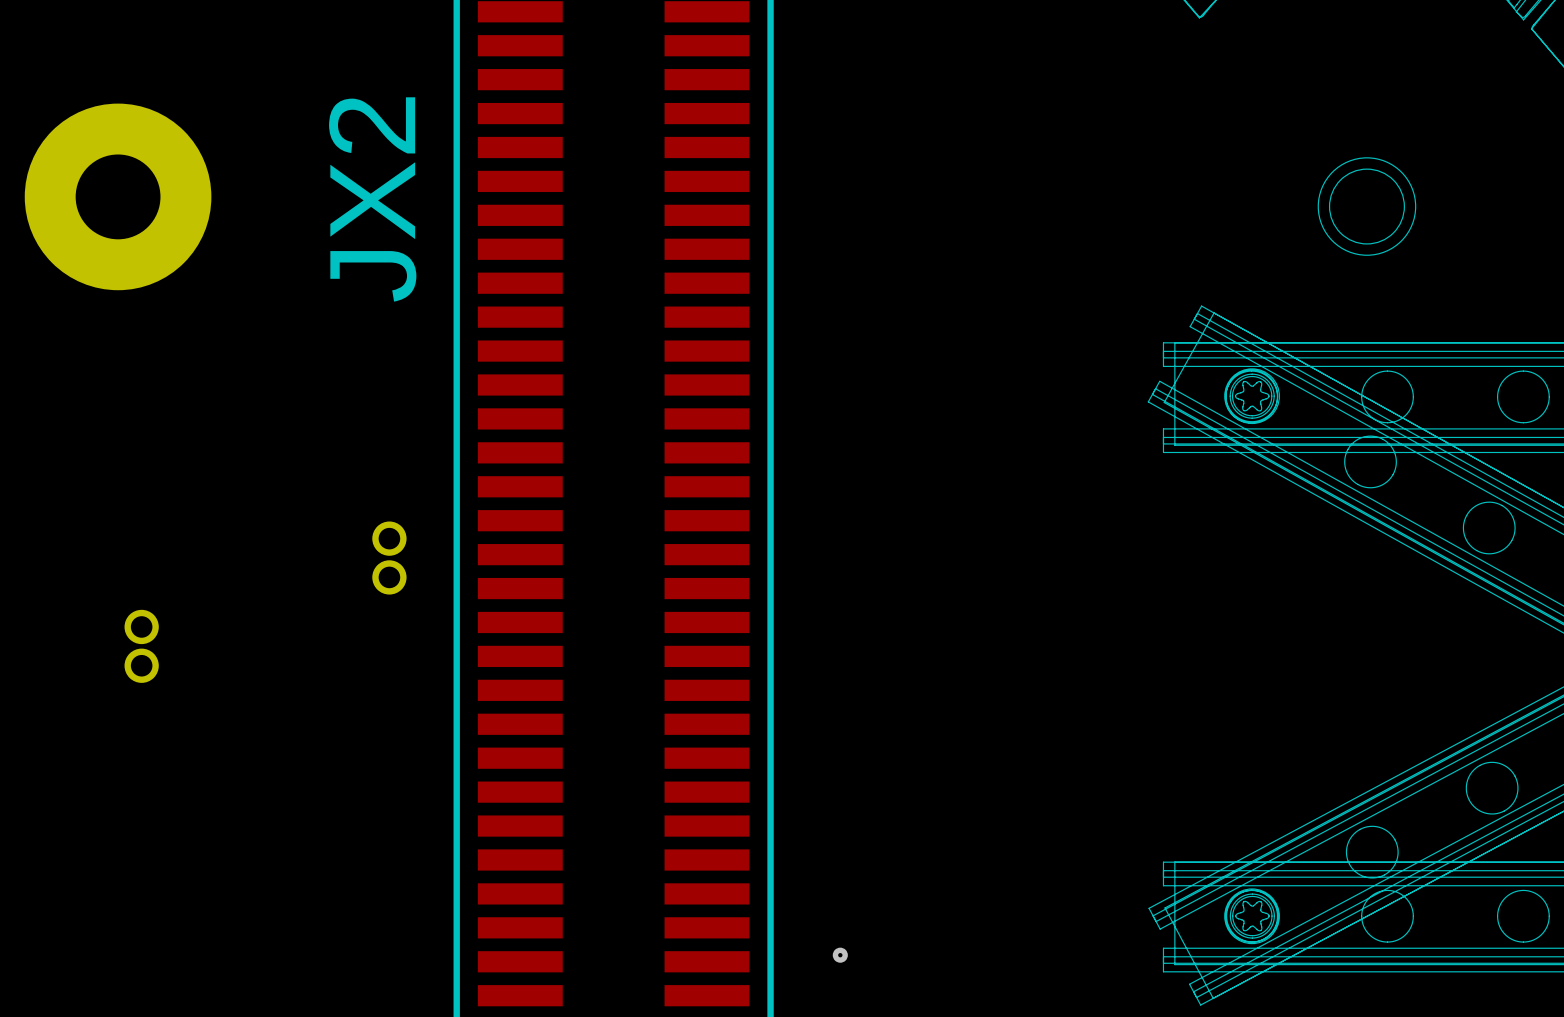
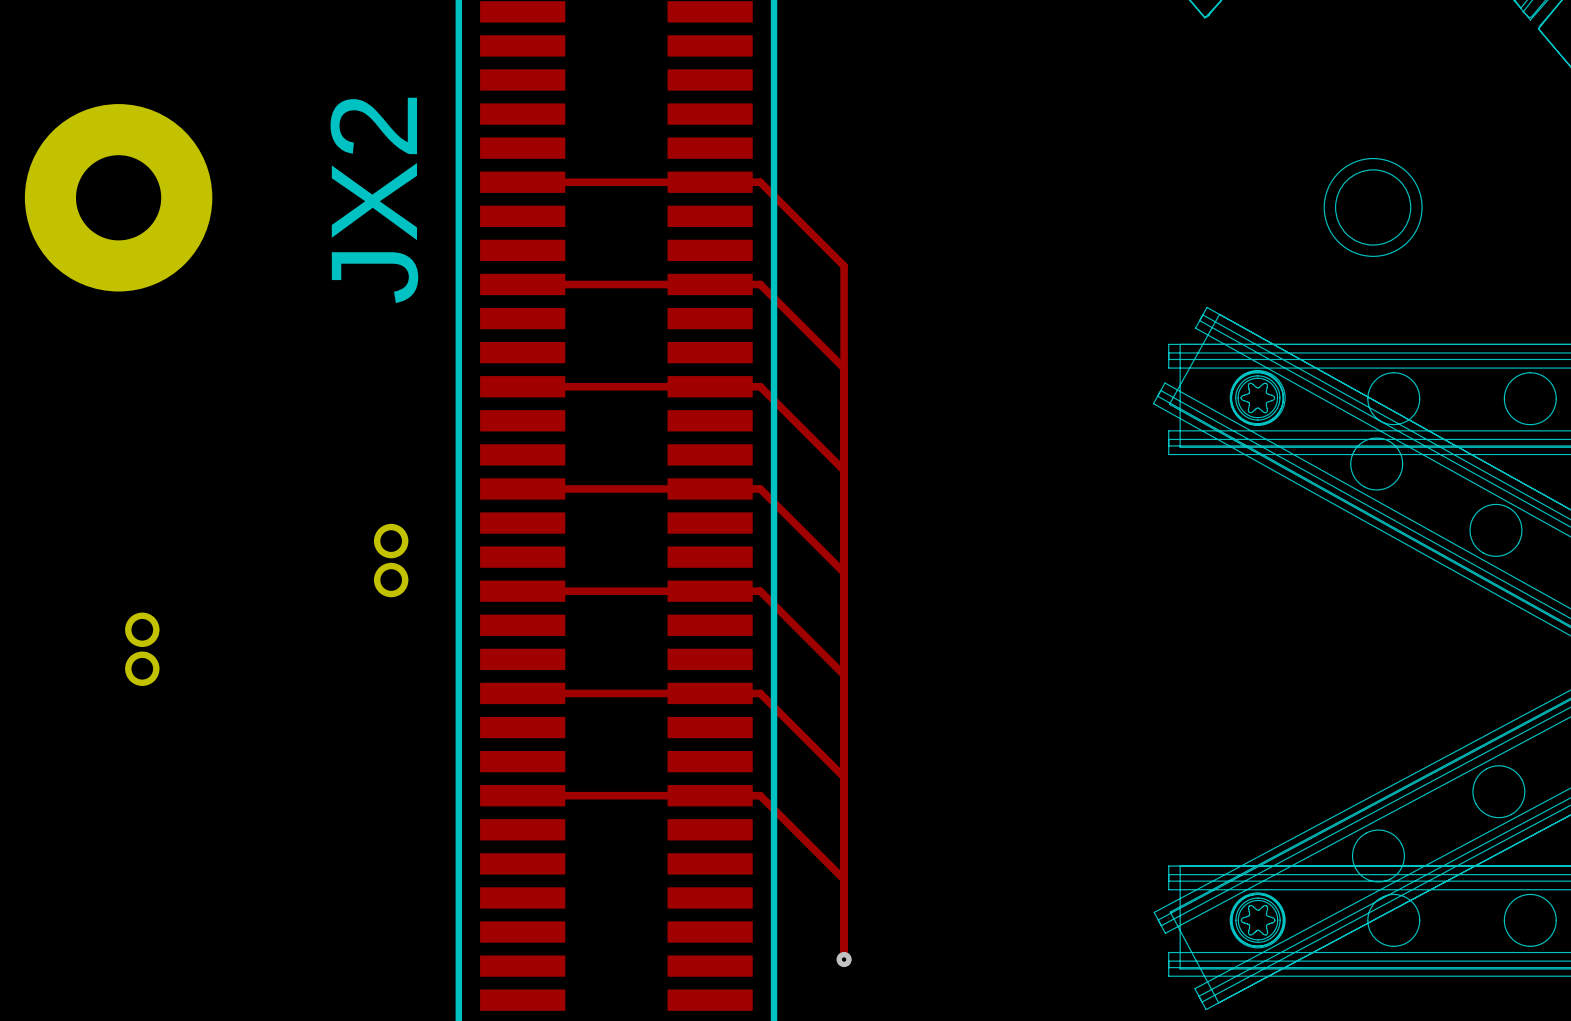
track: none -> (522, 182) (760, 182) (844, 266) (844, 959)
track: none -> (522, 284) (760, 284) (844, 368)
track: none -> (522, 386) (760, 386) (844, 470)
track: none -> (522, 488) (760, 488) (844, 572)
track: none -> (522, 591) (760, 591) (844, 675)
track: none -> (522, 693) (760, 693) (844, 777)
track: none -> (522, 795) (760, 795) (844, 879)

